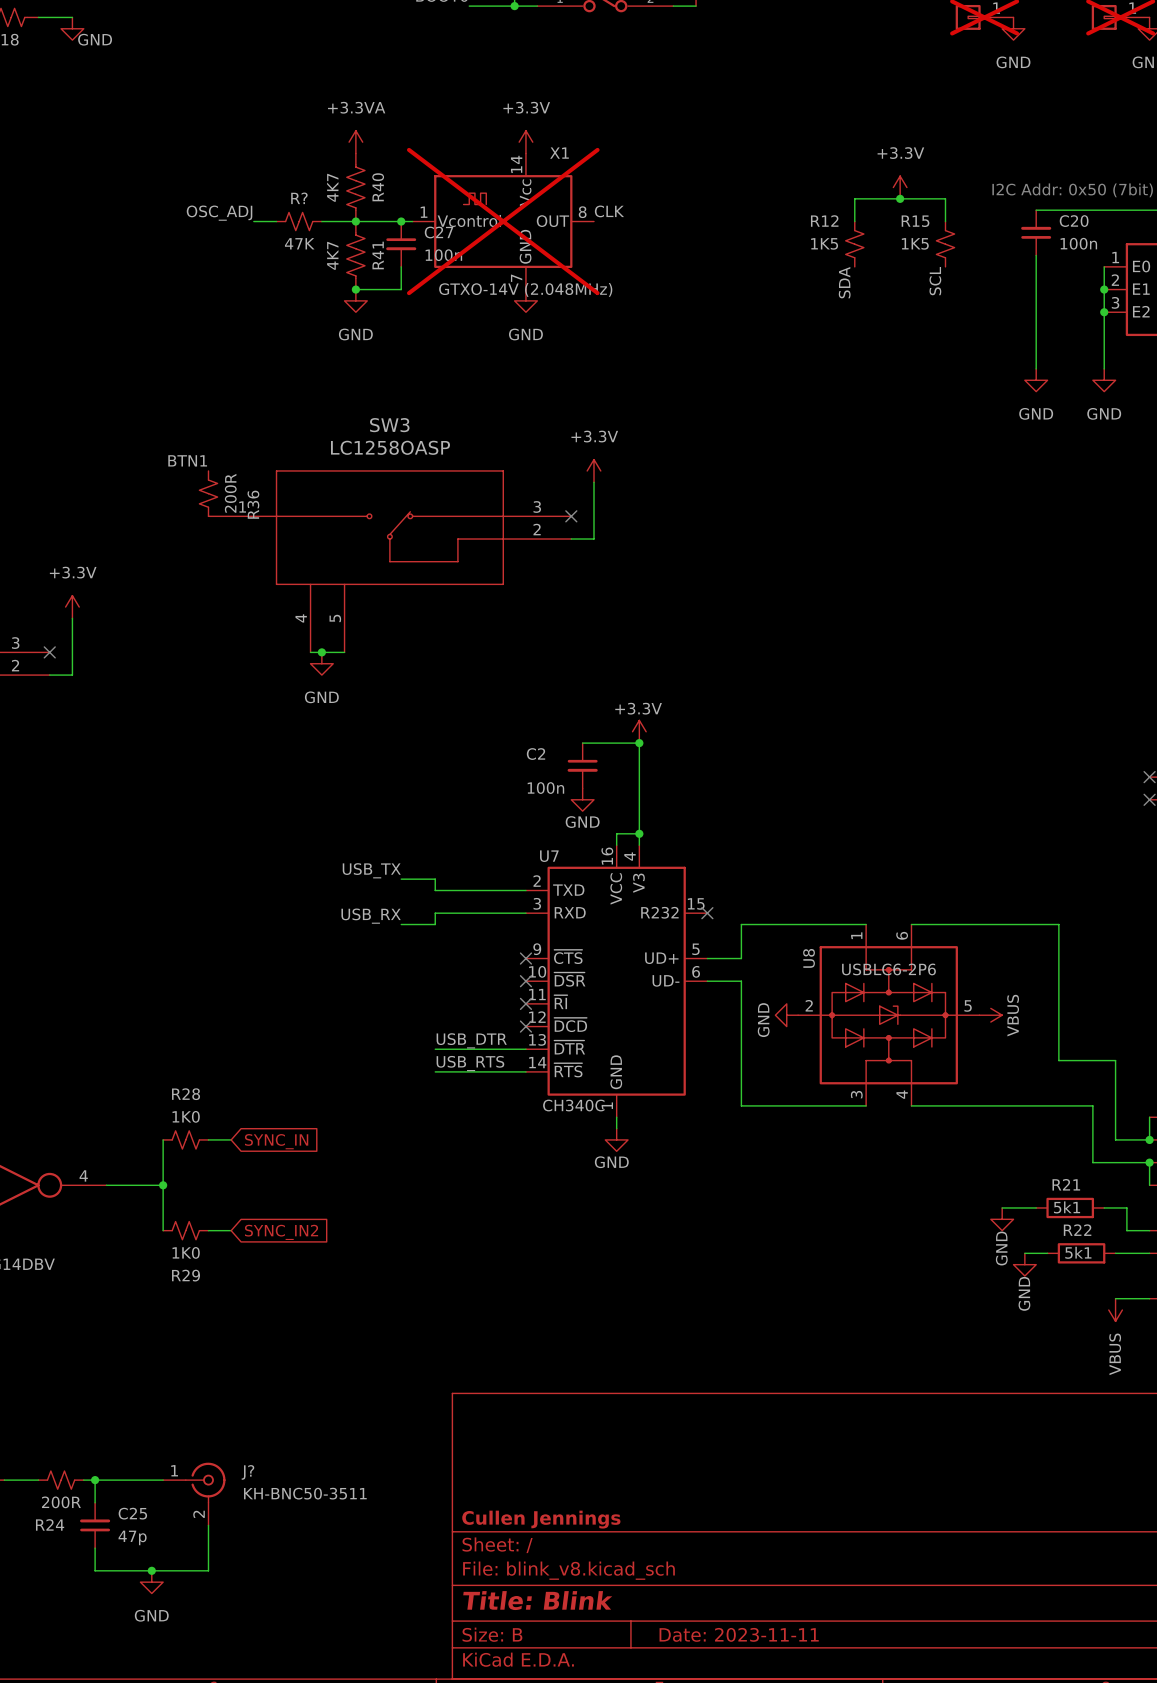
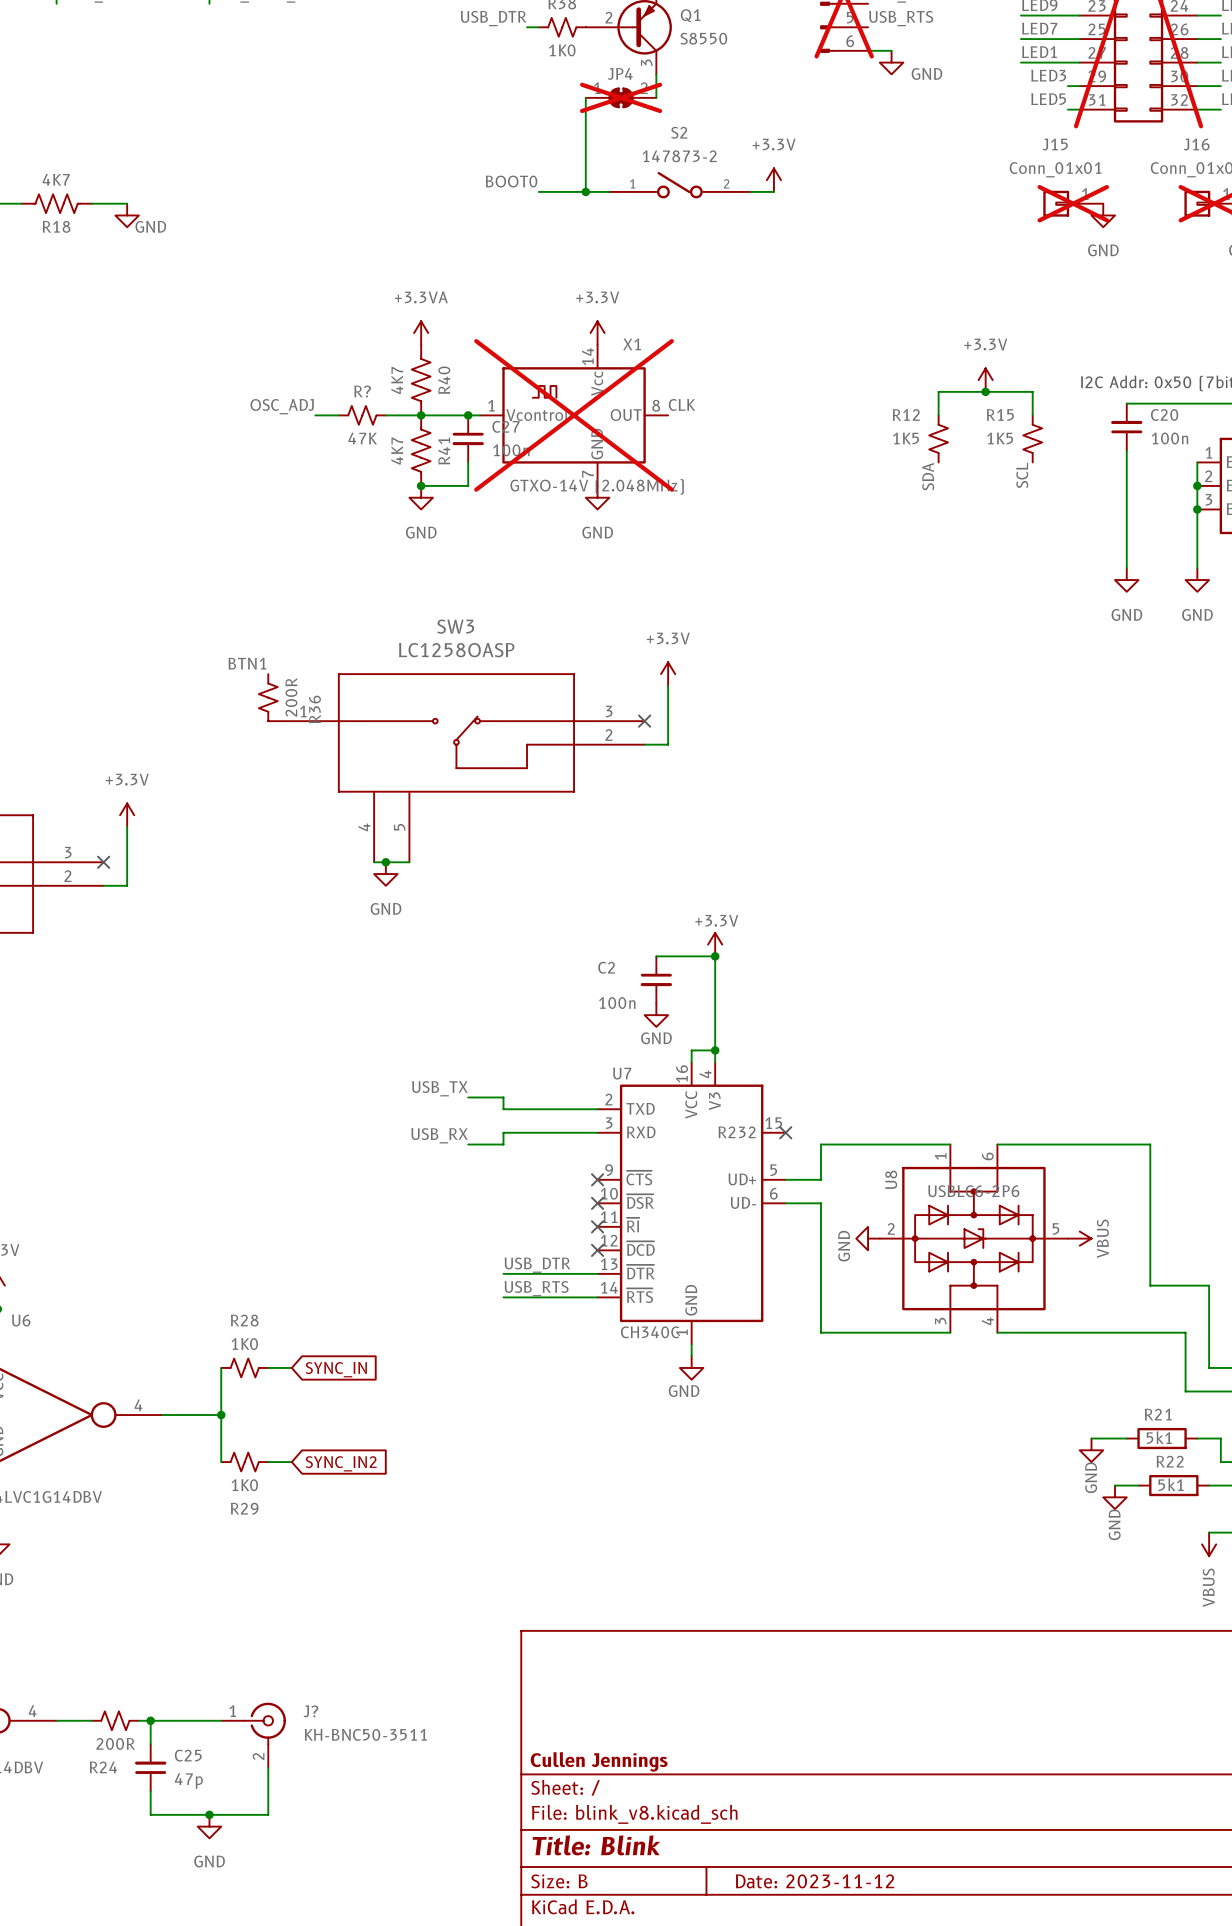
title block: Date: 2023-11-11 (739, 1634) -> Date: 2023-11-12 (815, 1881)

